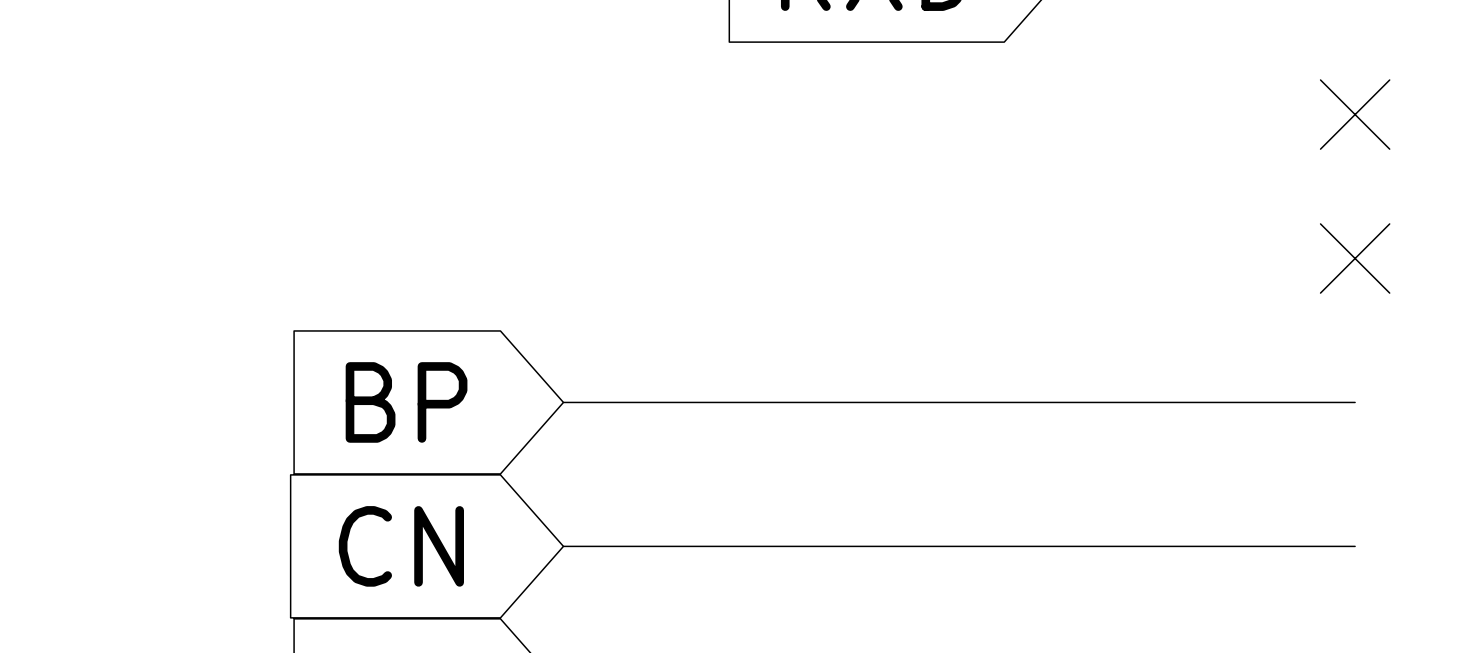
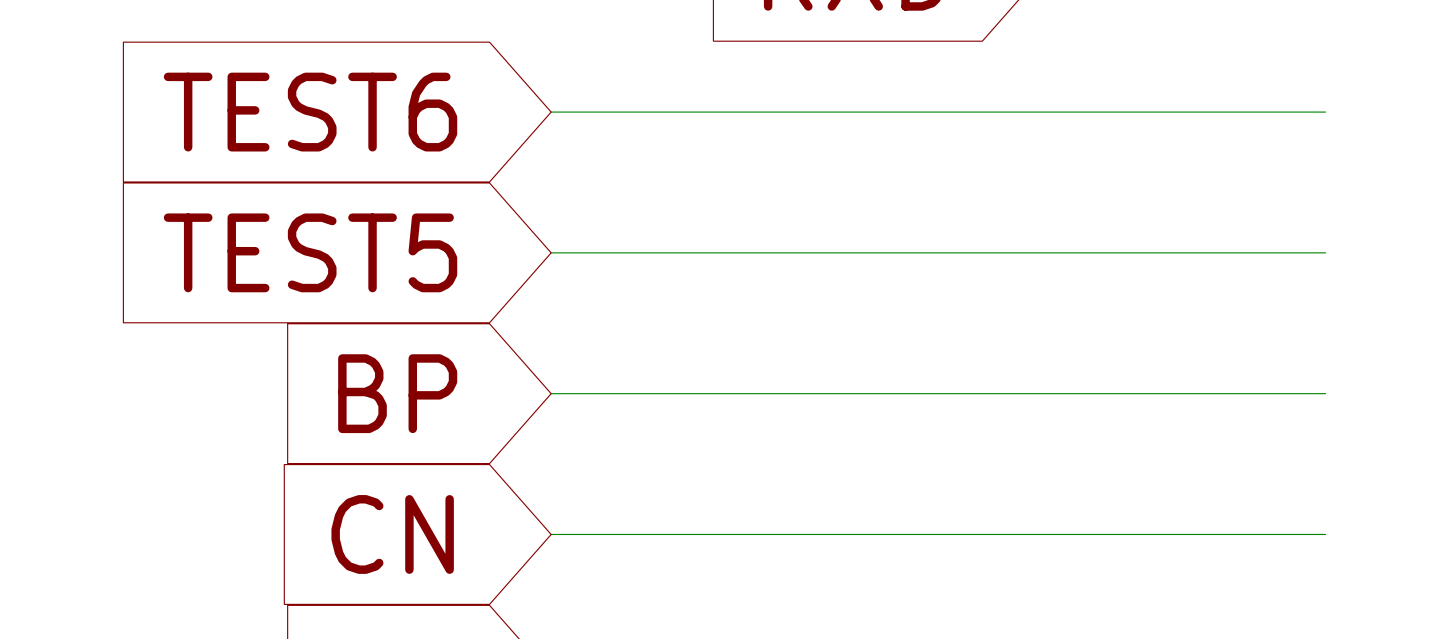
global label: none -> TEST6 (310, 112)
wire: none -> (551, 112) (1325, 112)
no-connect mark: (1355, 114) -> none
global label: none -> TEST5 (310, 252)
wire: none -> (551, 252) (1325, 252)
no-connect mark: (1355, 258) -> none

